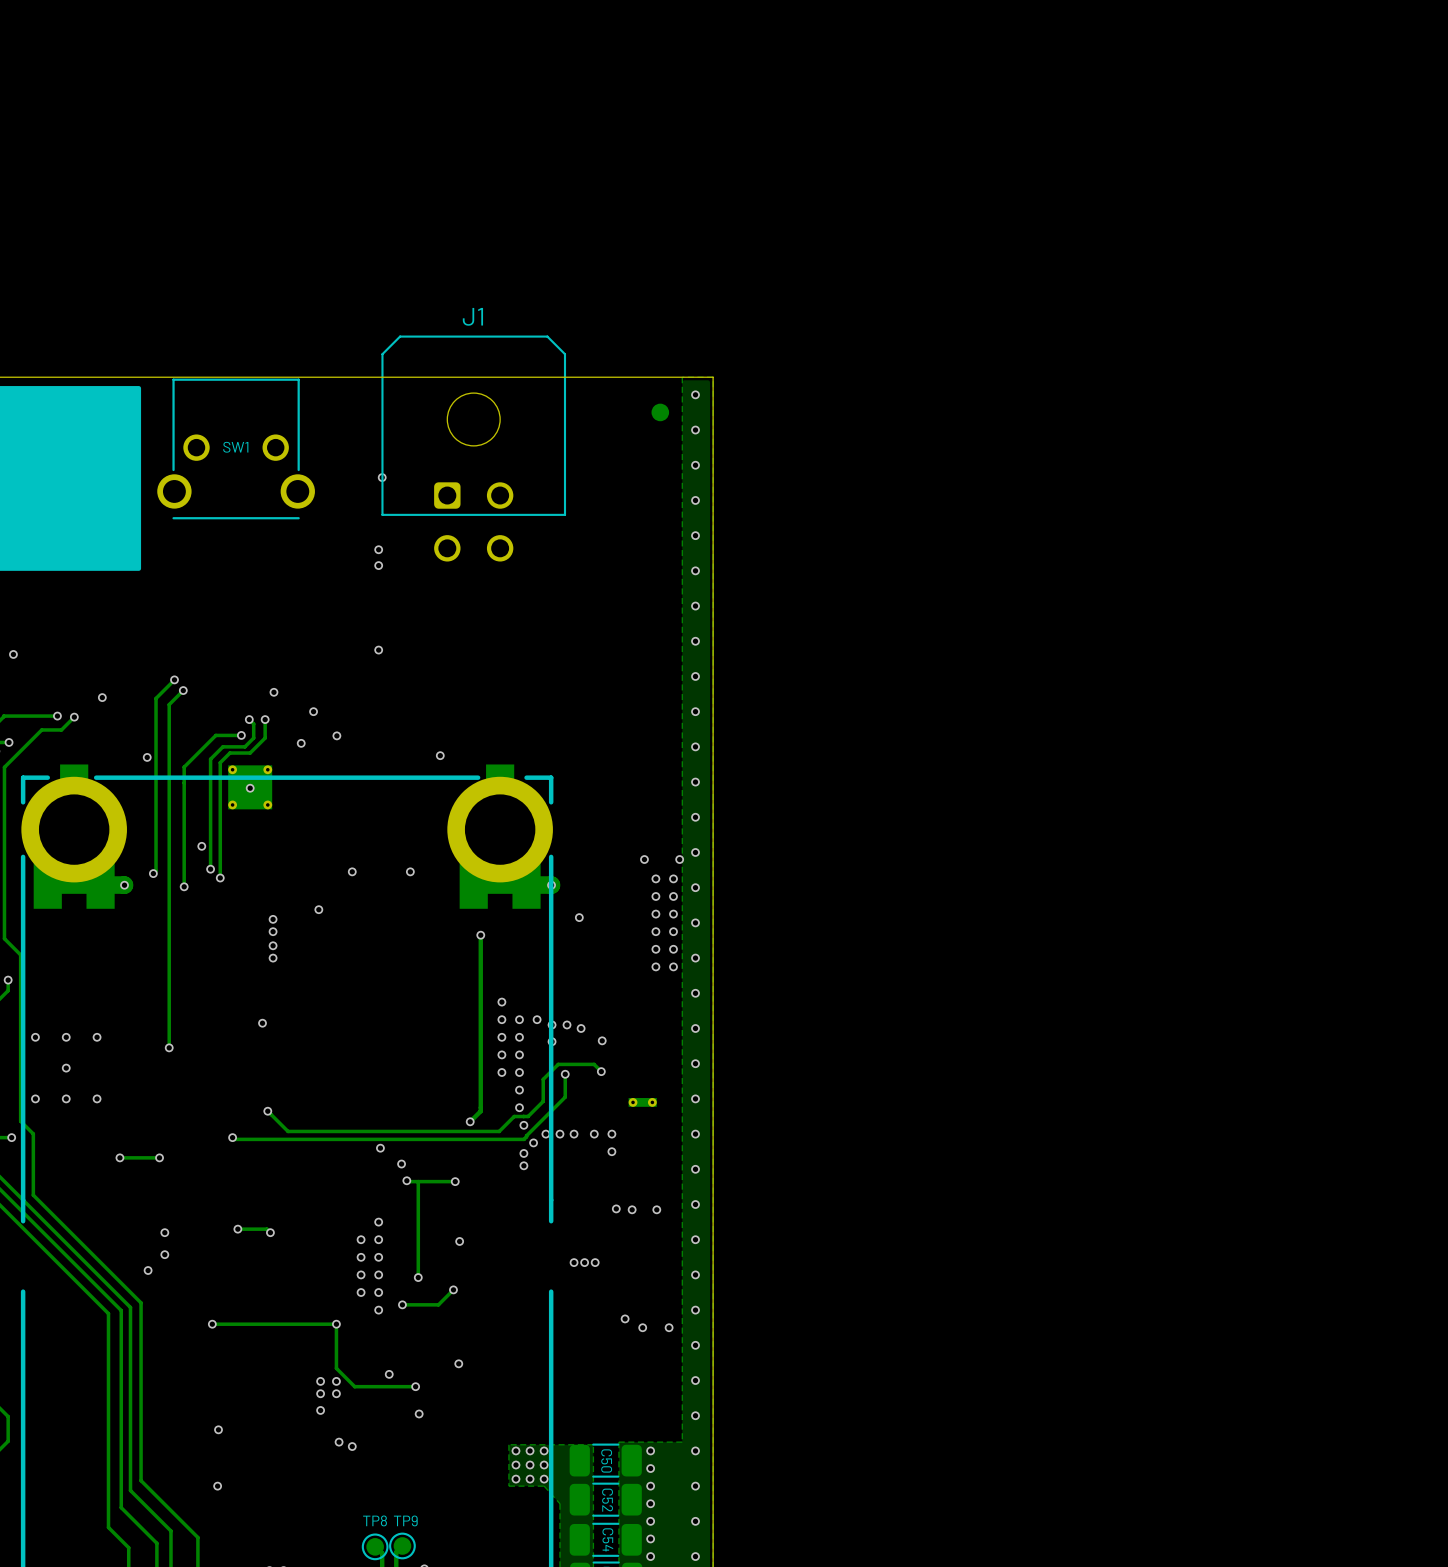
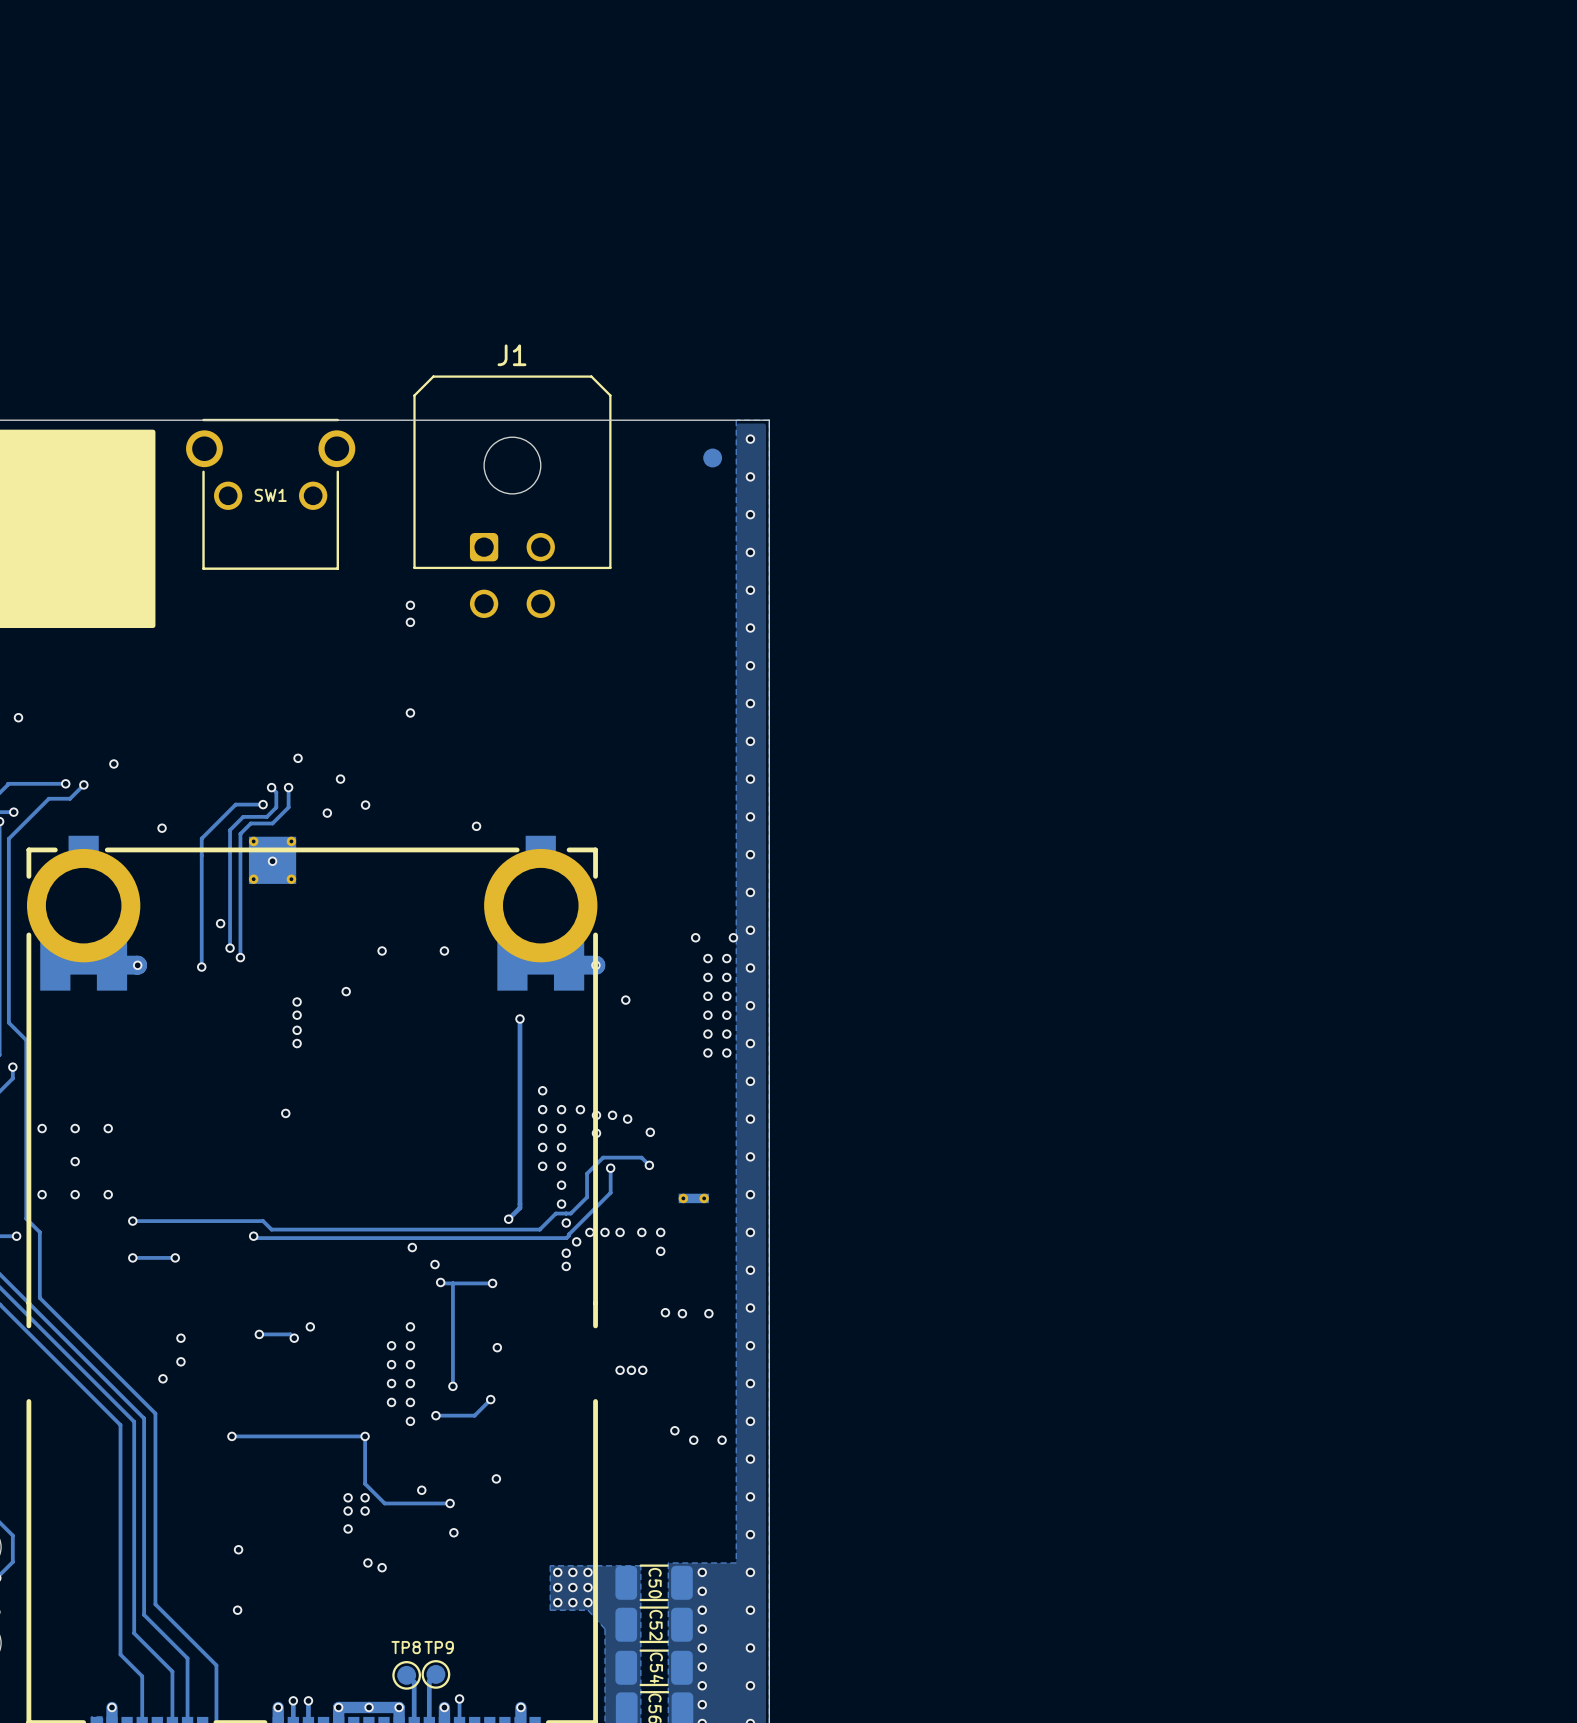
SW1 rotation: 0° (236, 448) -> 180° (270, 494)
via: (382, 477) -> none
track: (174, 679) (156, 698) (156, 870) (153, 873) -> none
via: (174, 679) -> none
track: (183, 690) (169, 704) (169, 1047) -> none
via: (183, 690) -> none
via: (153, 873) -> none
via: (169, 1047) -> none
track: (267, 1111) (288, 1131) -> (132, 1221) (263, 1221) (271, 1229) (313, 1229)
via: (267, 1111) -> none
via: none -> (132, 1221)
via: none -> (310, 1326)

